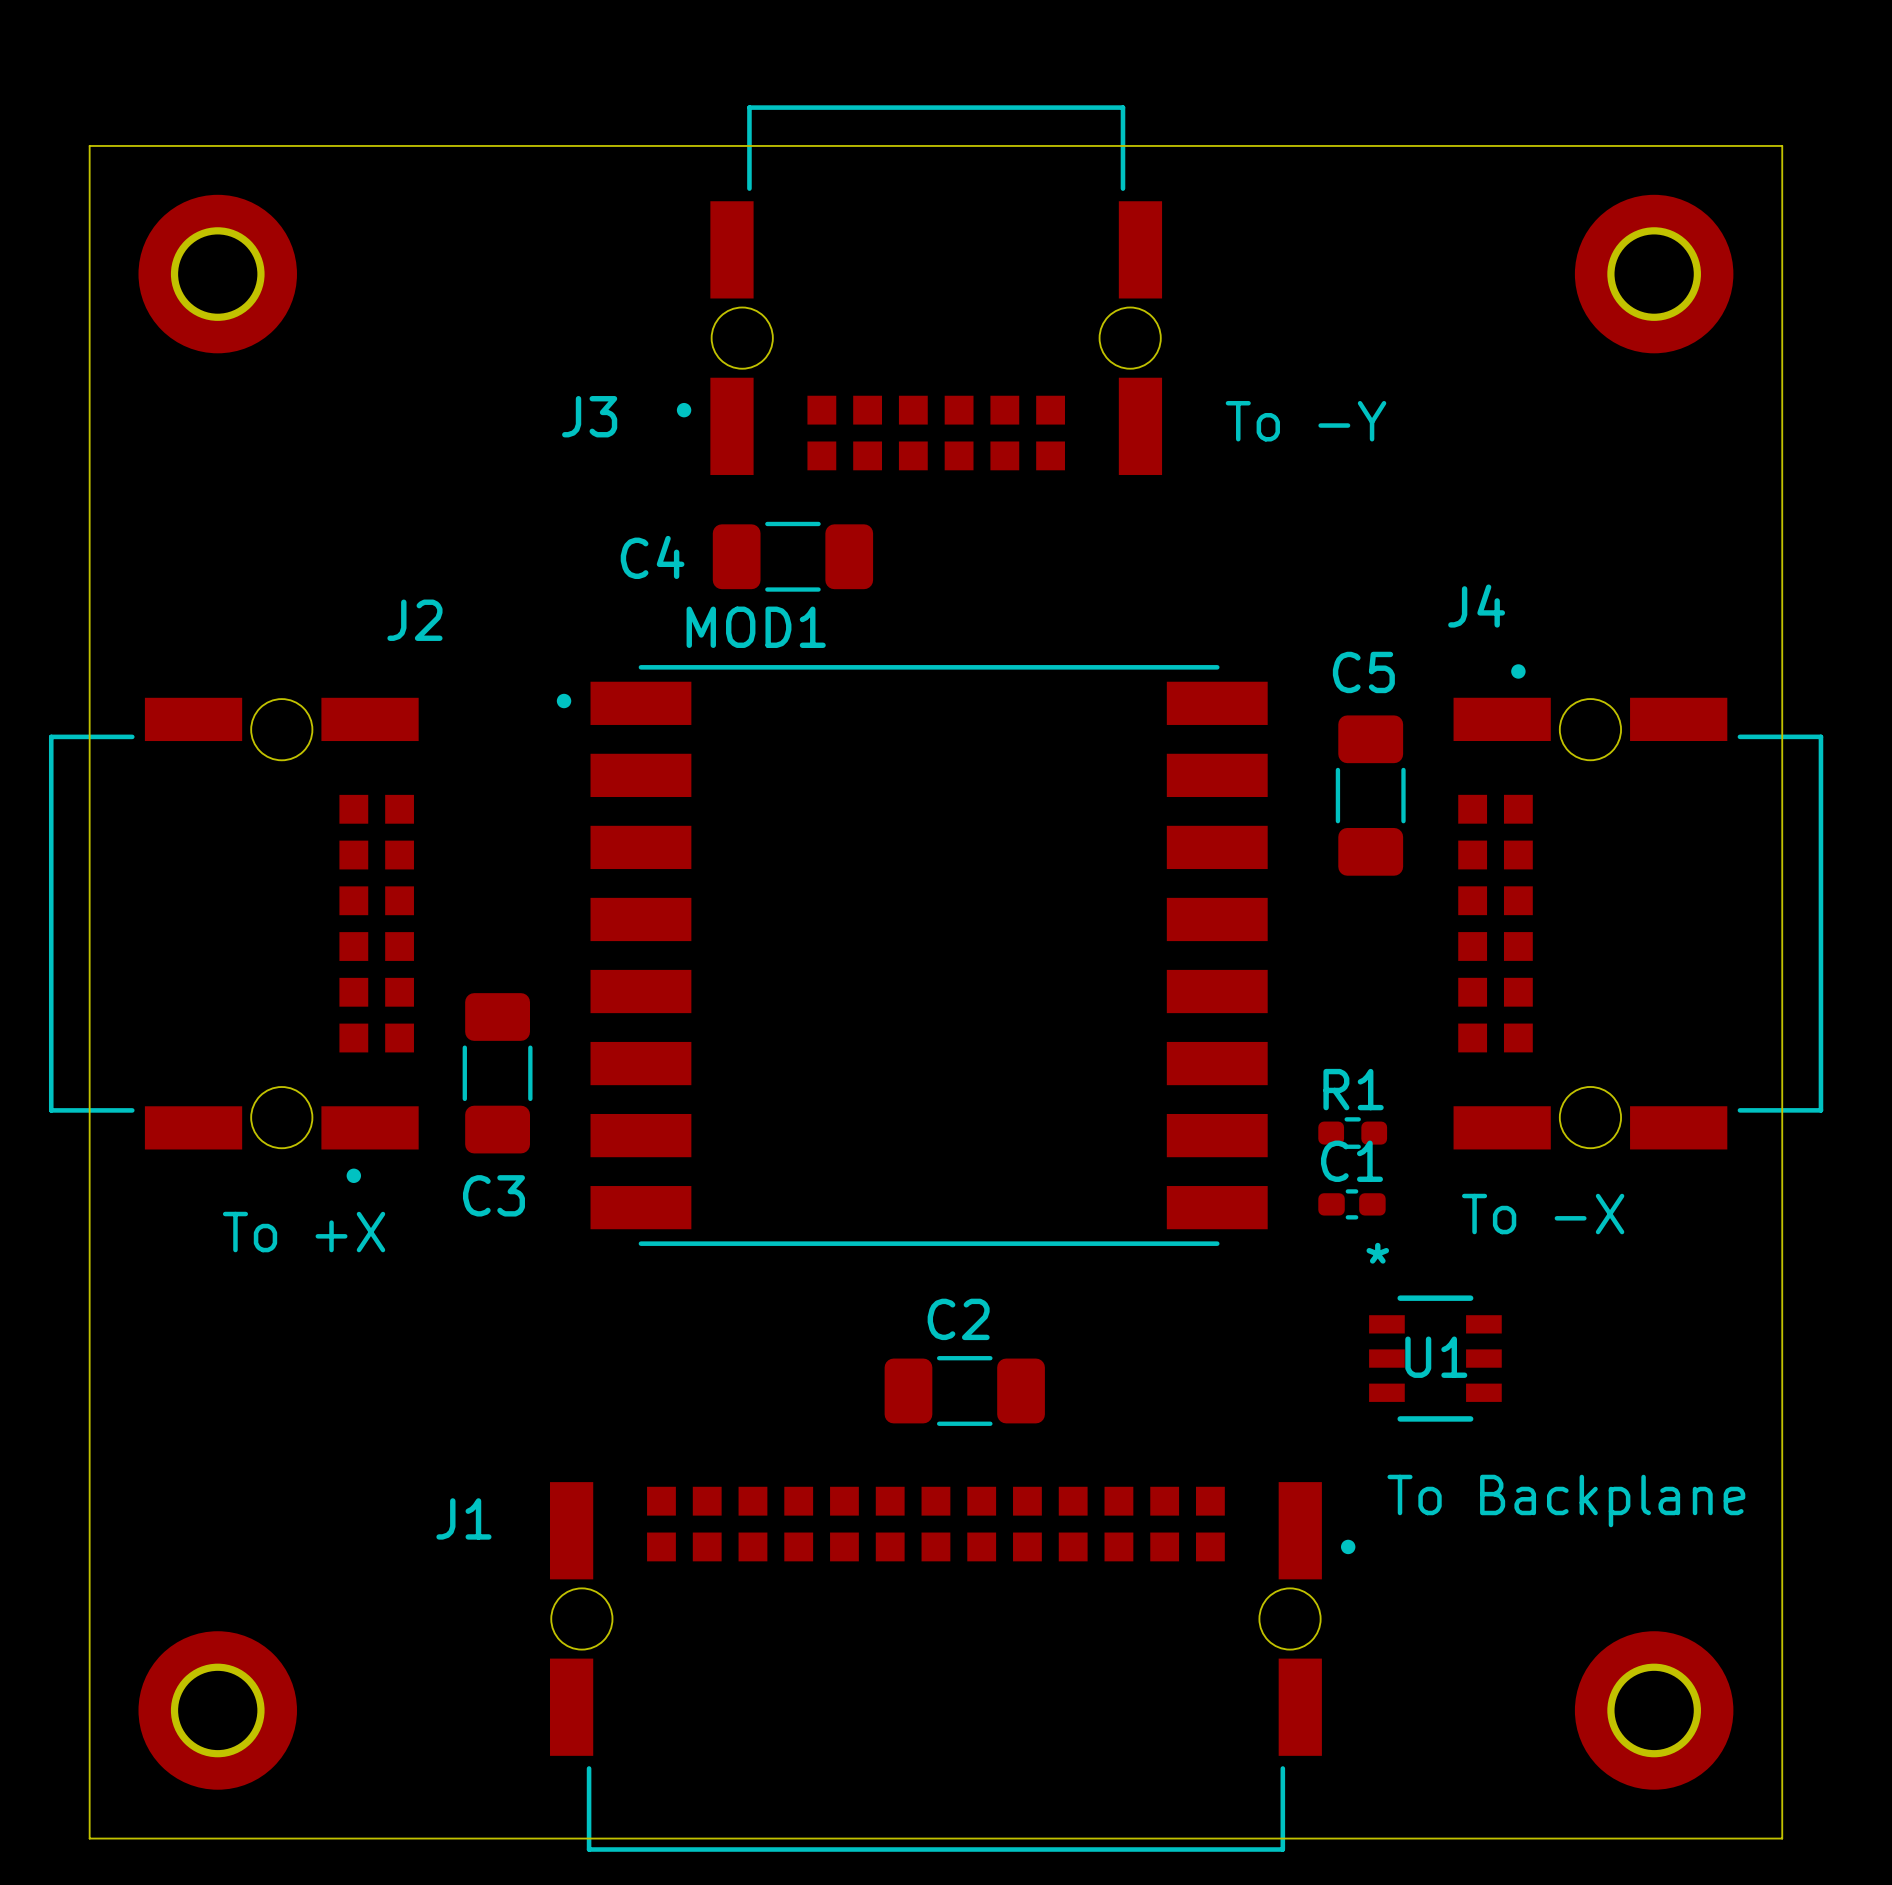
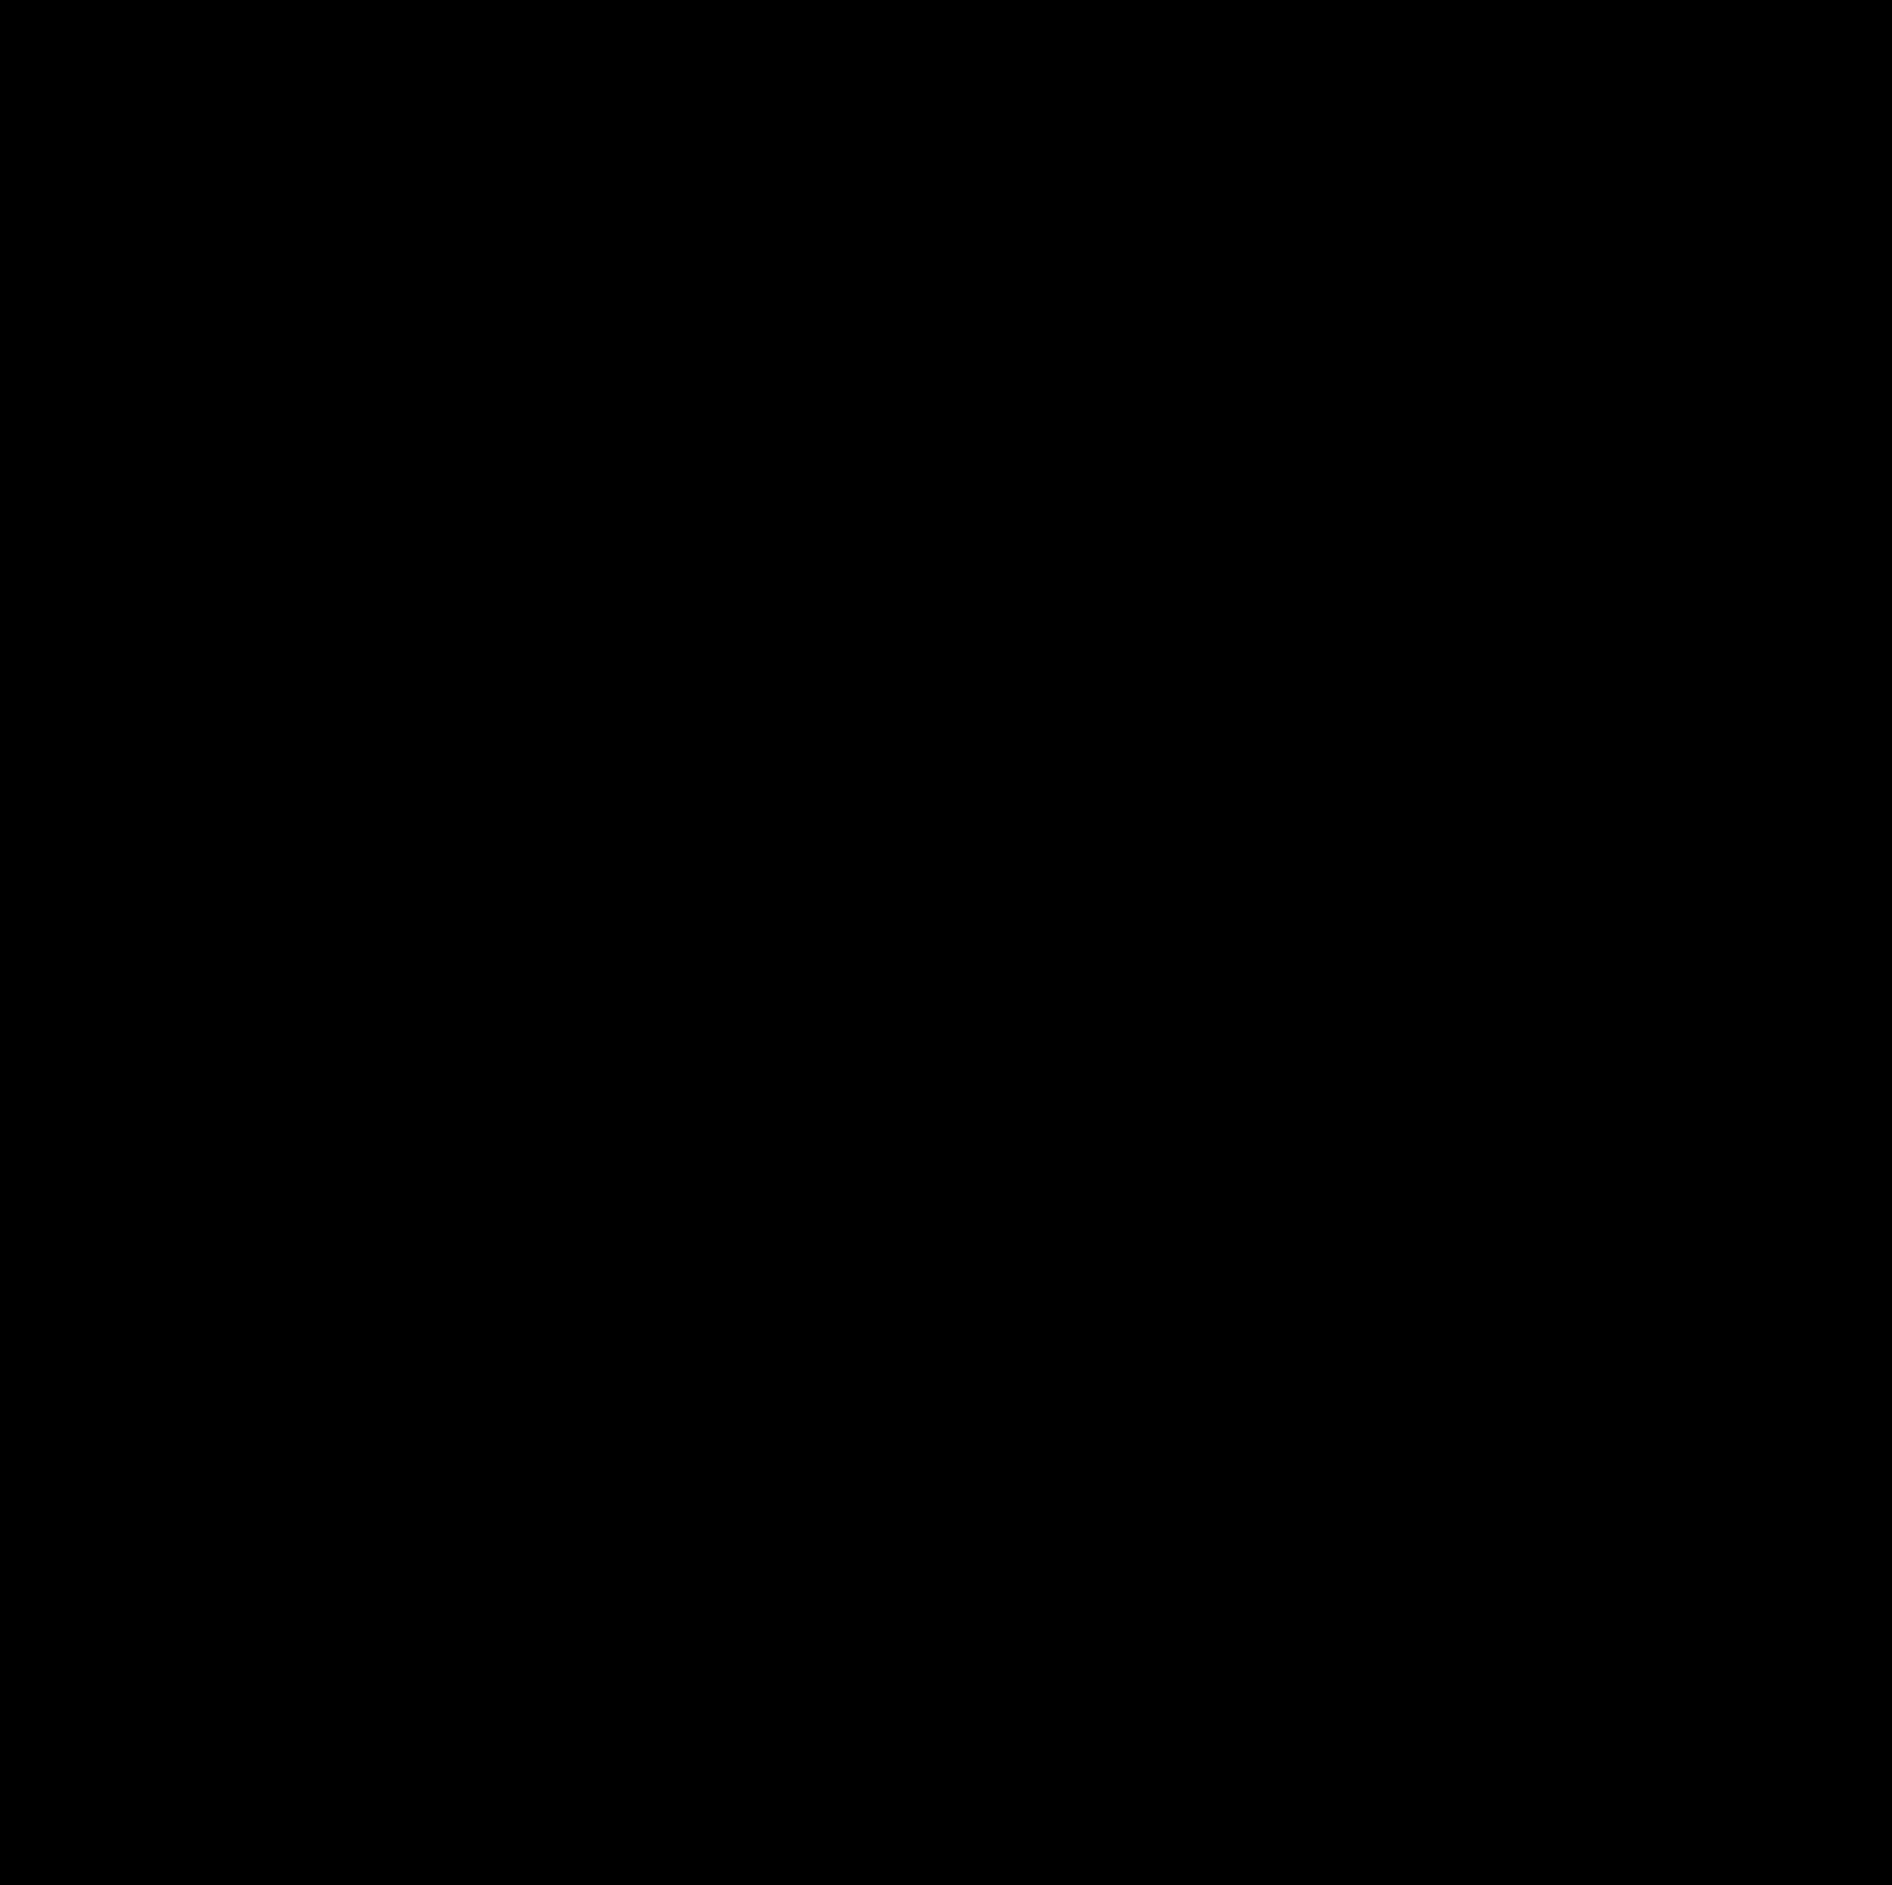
board edge: (89, 145) (1782, 145) (1782, 1838) (89, 1838) (89, 145) -> none
part: (217, 274) -> none
part: (1654, 274) -> none
J3: (919, 290) -> none
text: To -Y (1306, 421) -> none
C4: (792, 556) -> none
C5: (1370, 795) -> none
J4: (1638, 906) -> none
J2: (233, 940) -> none
MOD1: (912, 955) -> none
C3: (497, 1073) -> none
R1: (1352, 1133) -> none
C1: (1351, 1204) -> none
text: To -X (1543, 1214) -> none
text: To +X (304, 1232) -> none
U1: (1435, 1358) -> none
C2: (964, 1390) -> none
text: To Backplane (1566, 1500) -> none
J1: (952, 1666) -> none
part: (217, 1710) -> none
part: (1654, 1710) -> none

